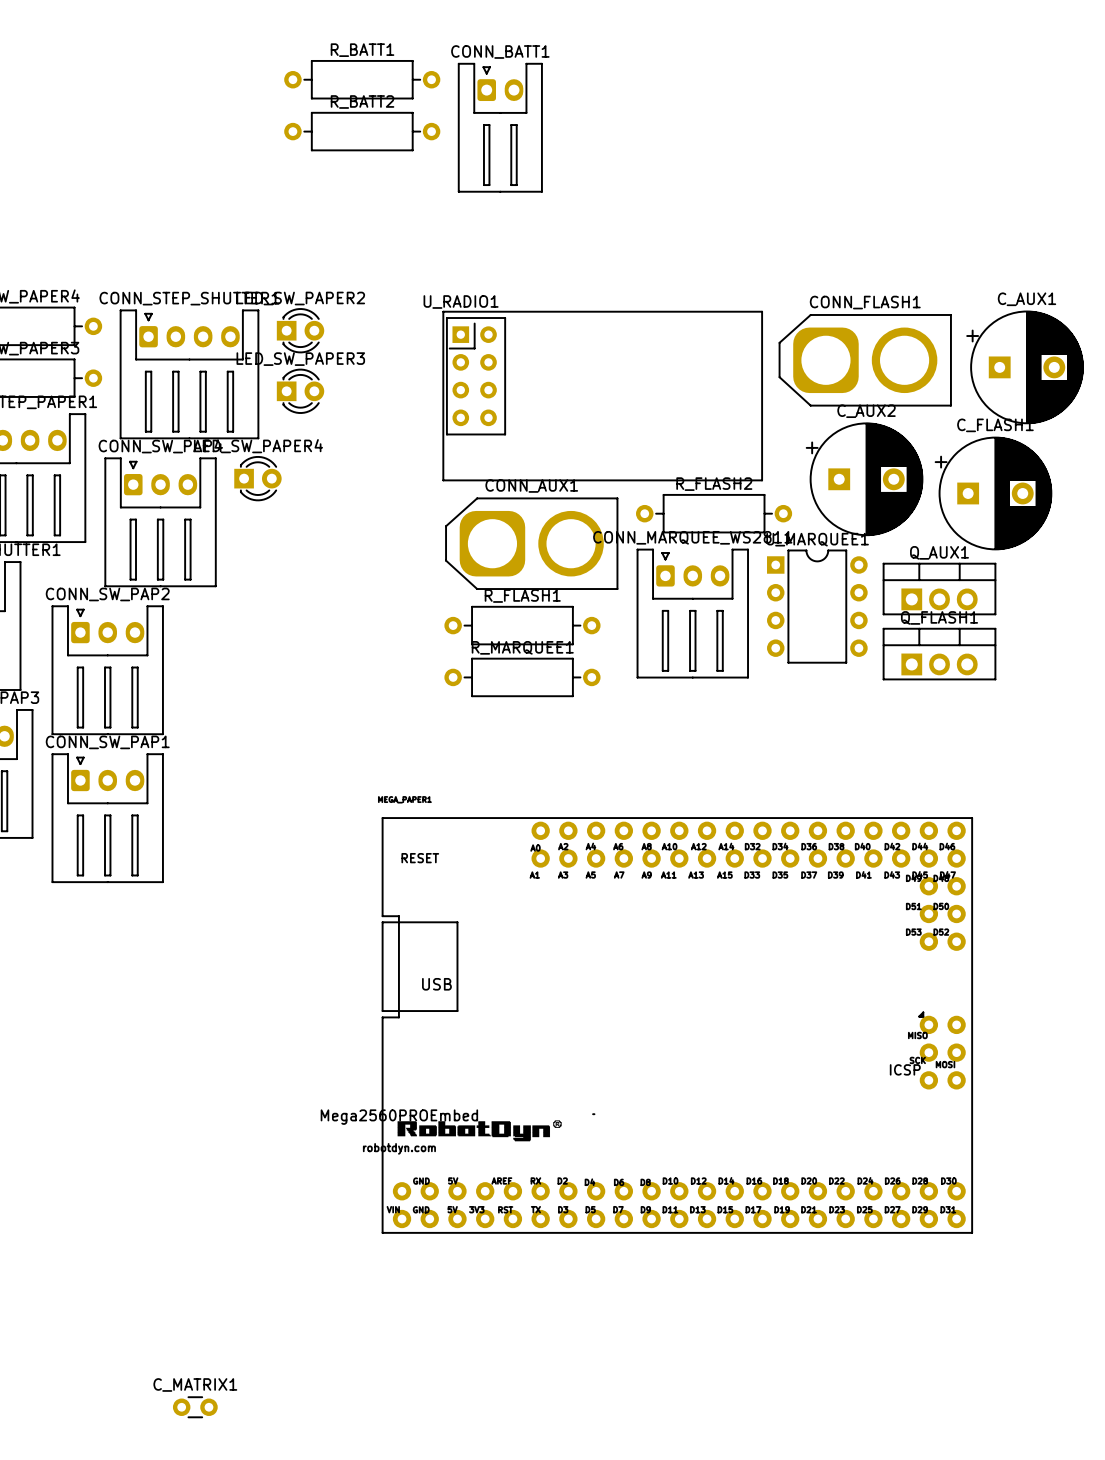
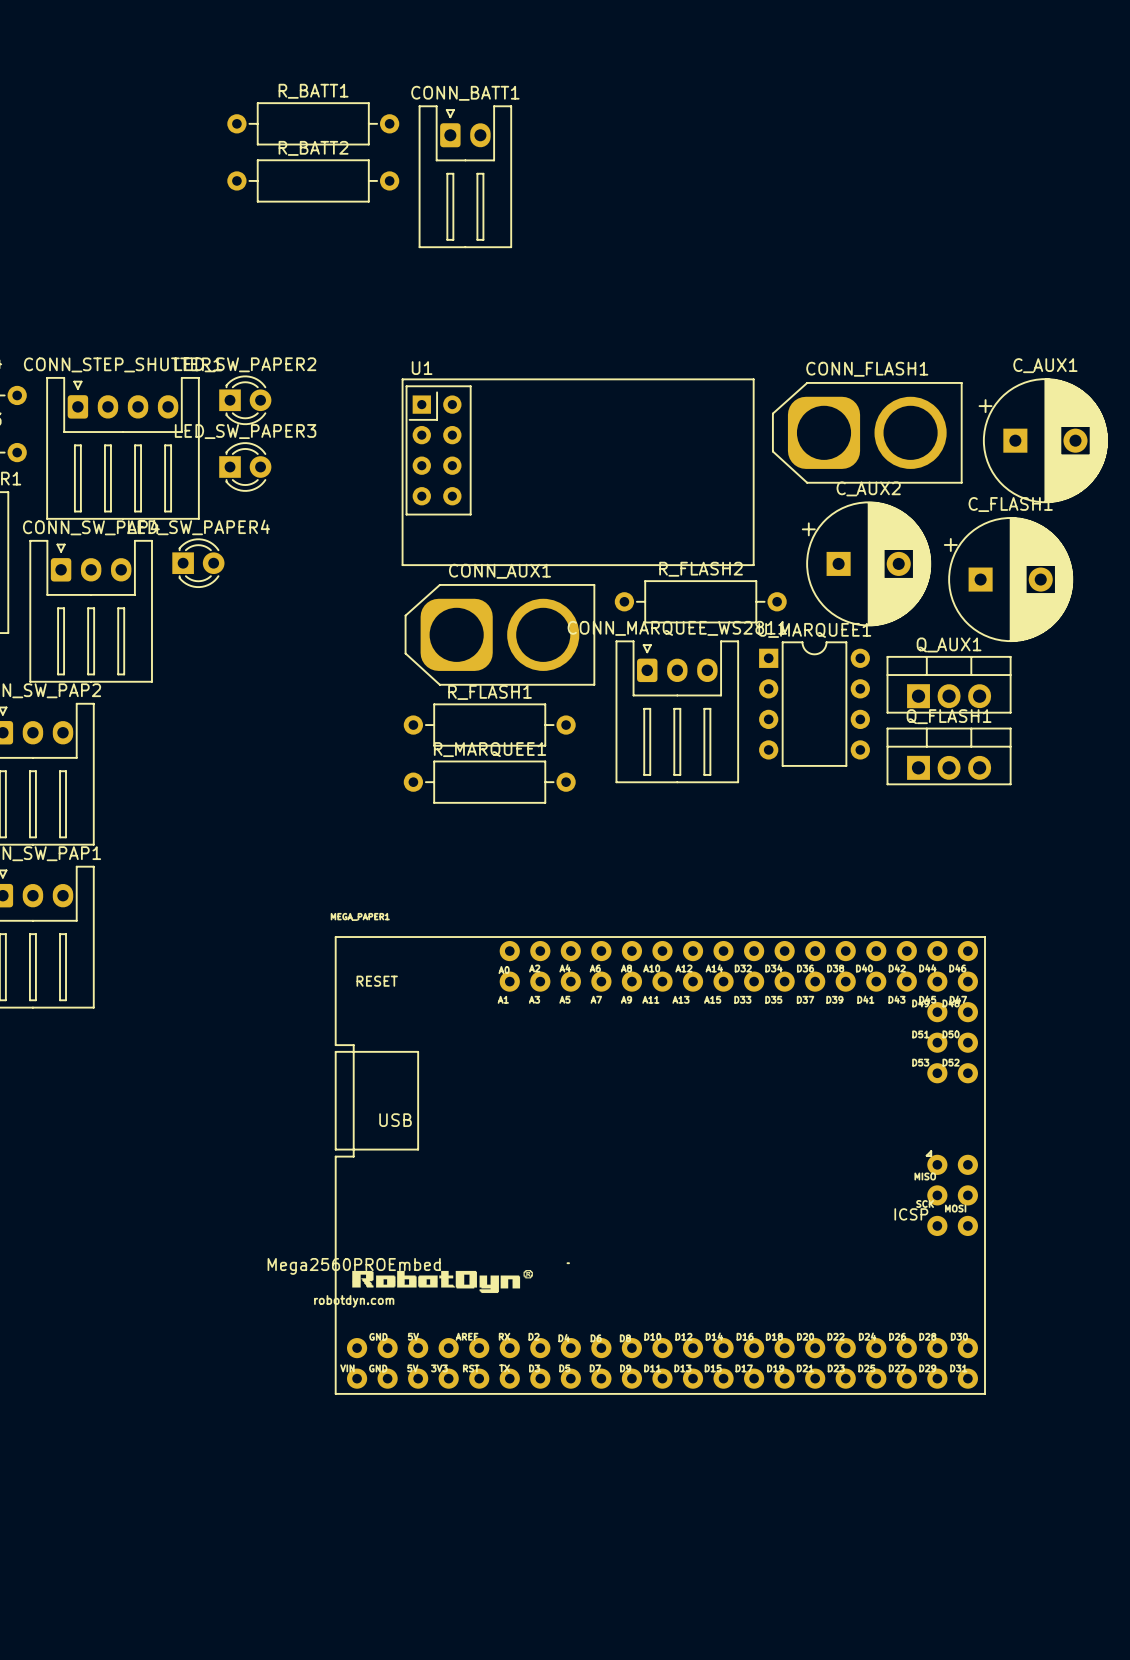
U_RADIO1 name: U_RADIO1 (461, 302) -> U1 (422, 368)
C_MATRIX1: (195, 1407) -> none

